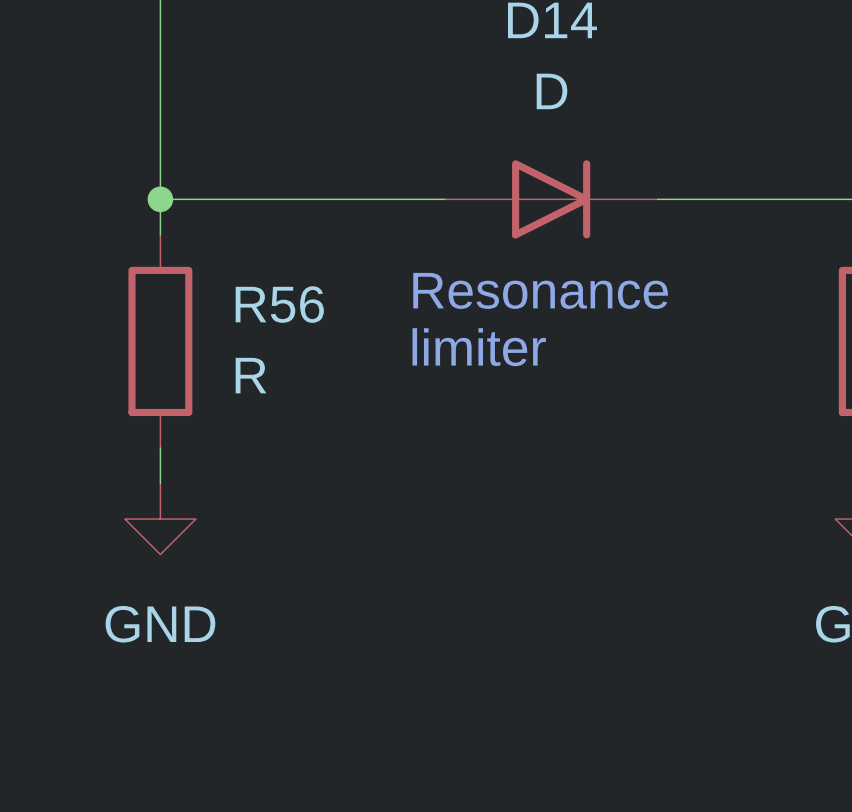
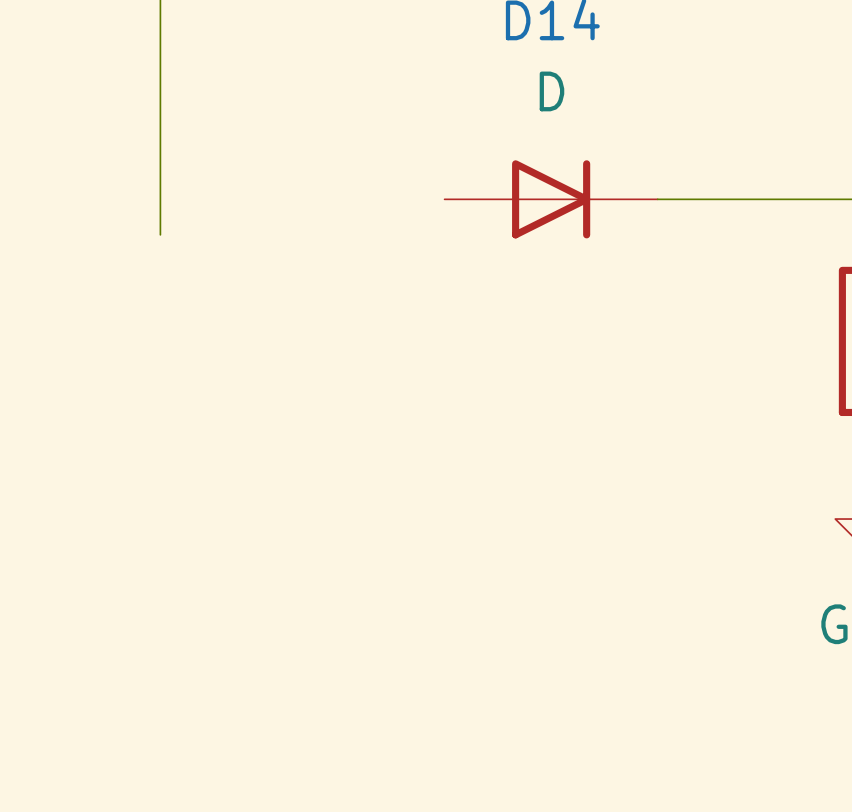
wire: (160, 199) (444, 199) -> none
junction: (160, 199) -> none
text: Resonance (540, 290) -> none
R56: R (160, 341) -> none
text: limiter (479, 347) -> none
wire: (160, 447) (160, 483) -> none
power symbol: GND (160, 519) -> none

